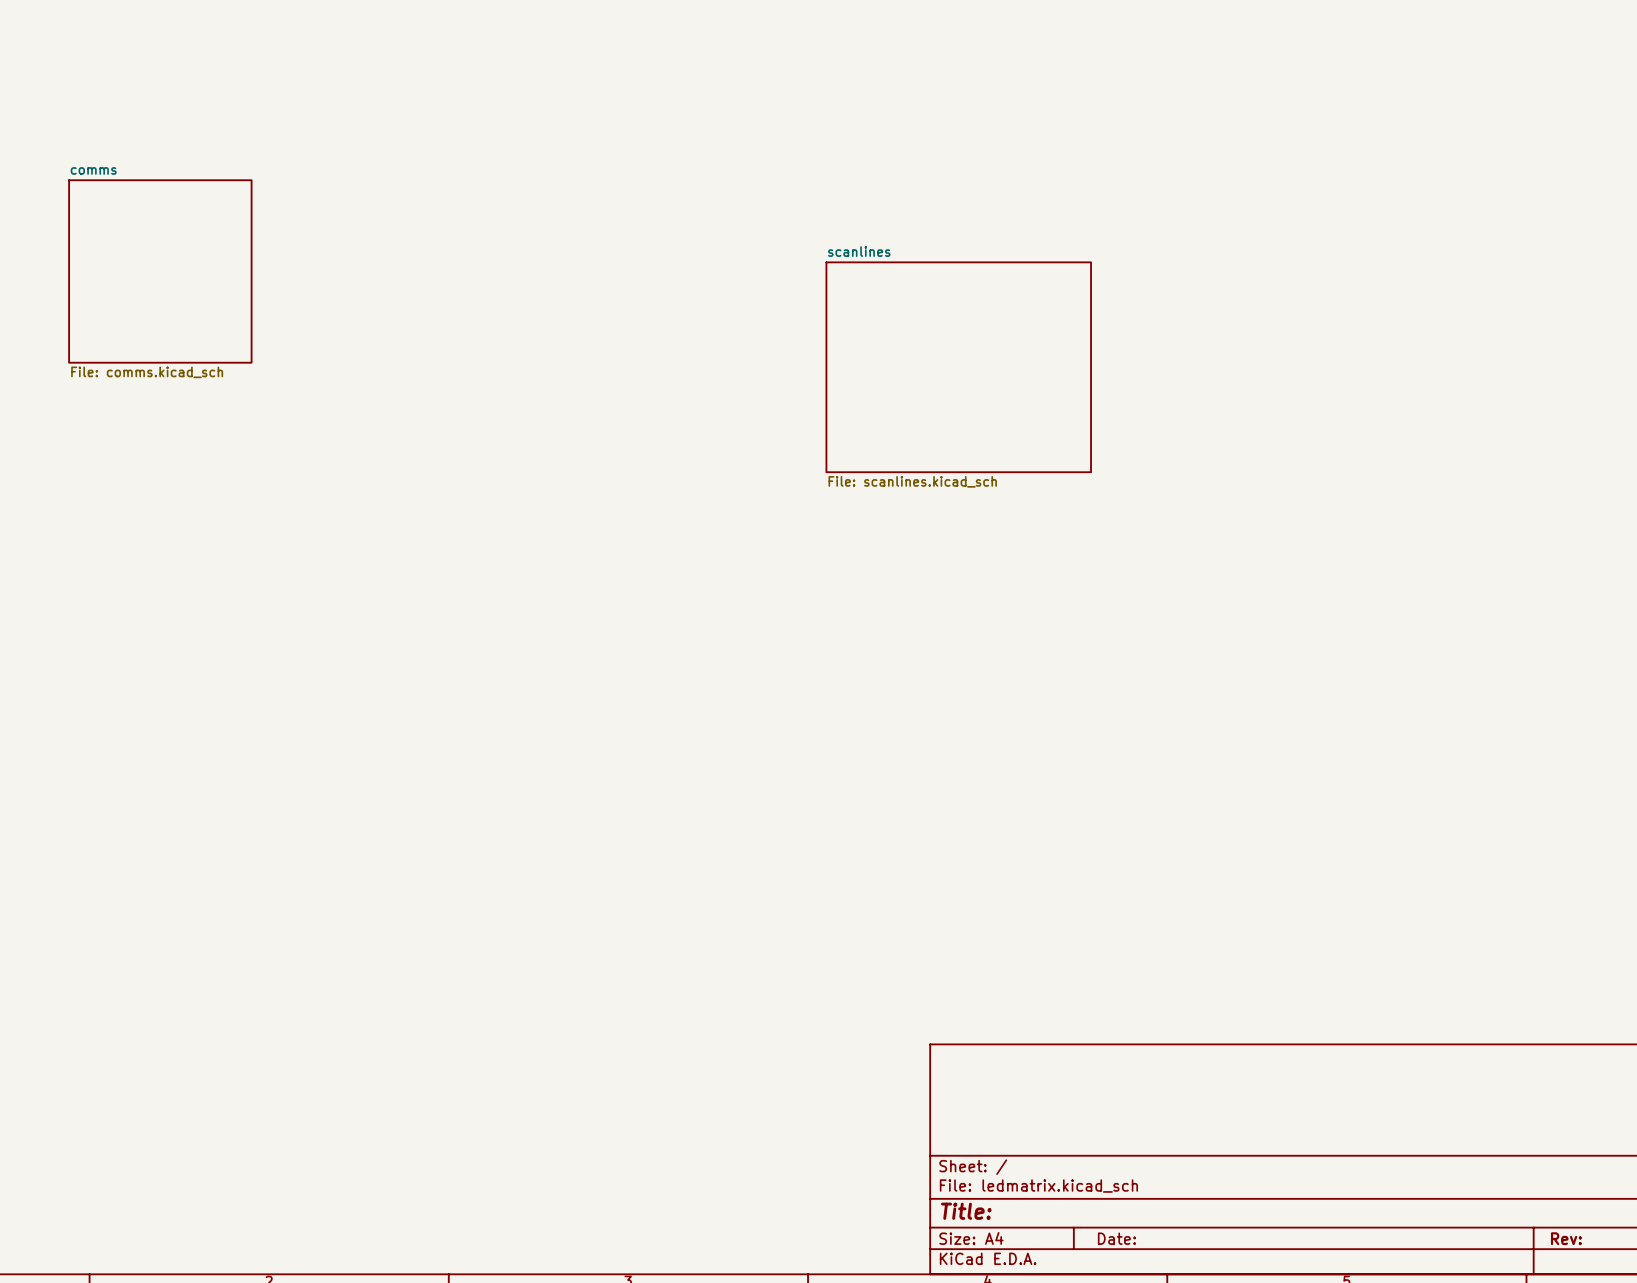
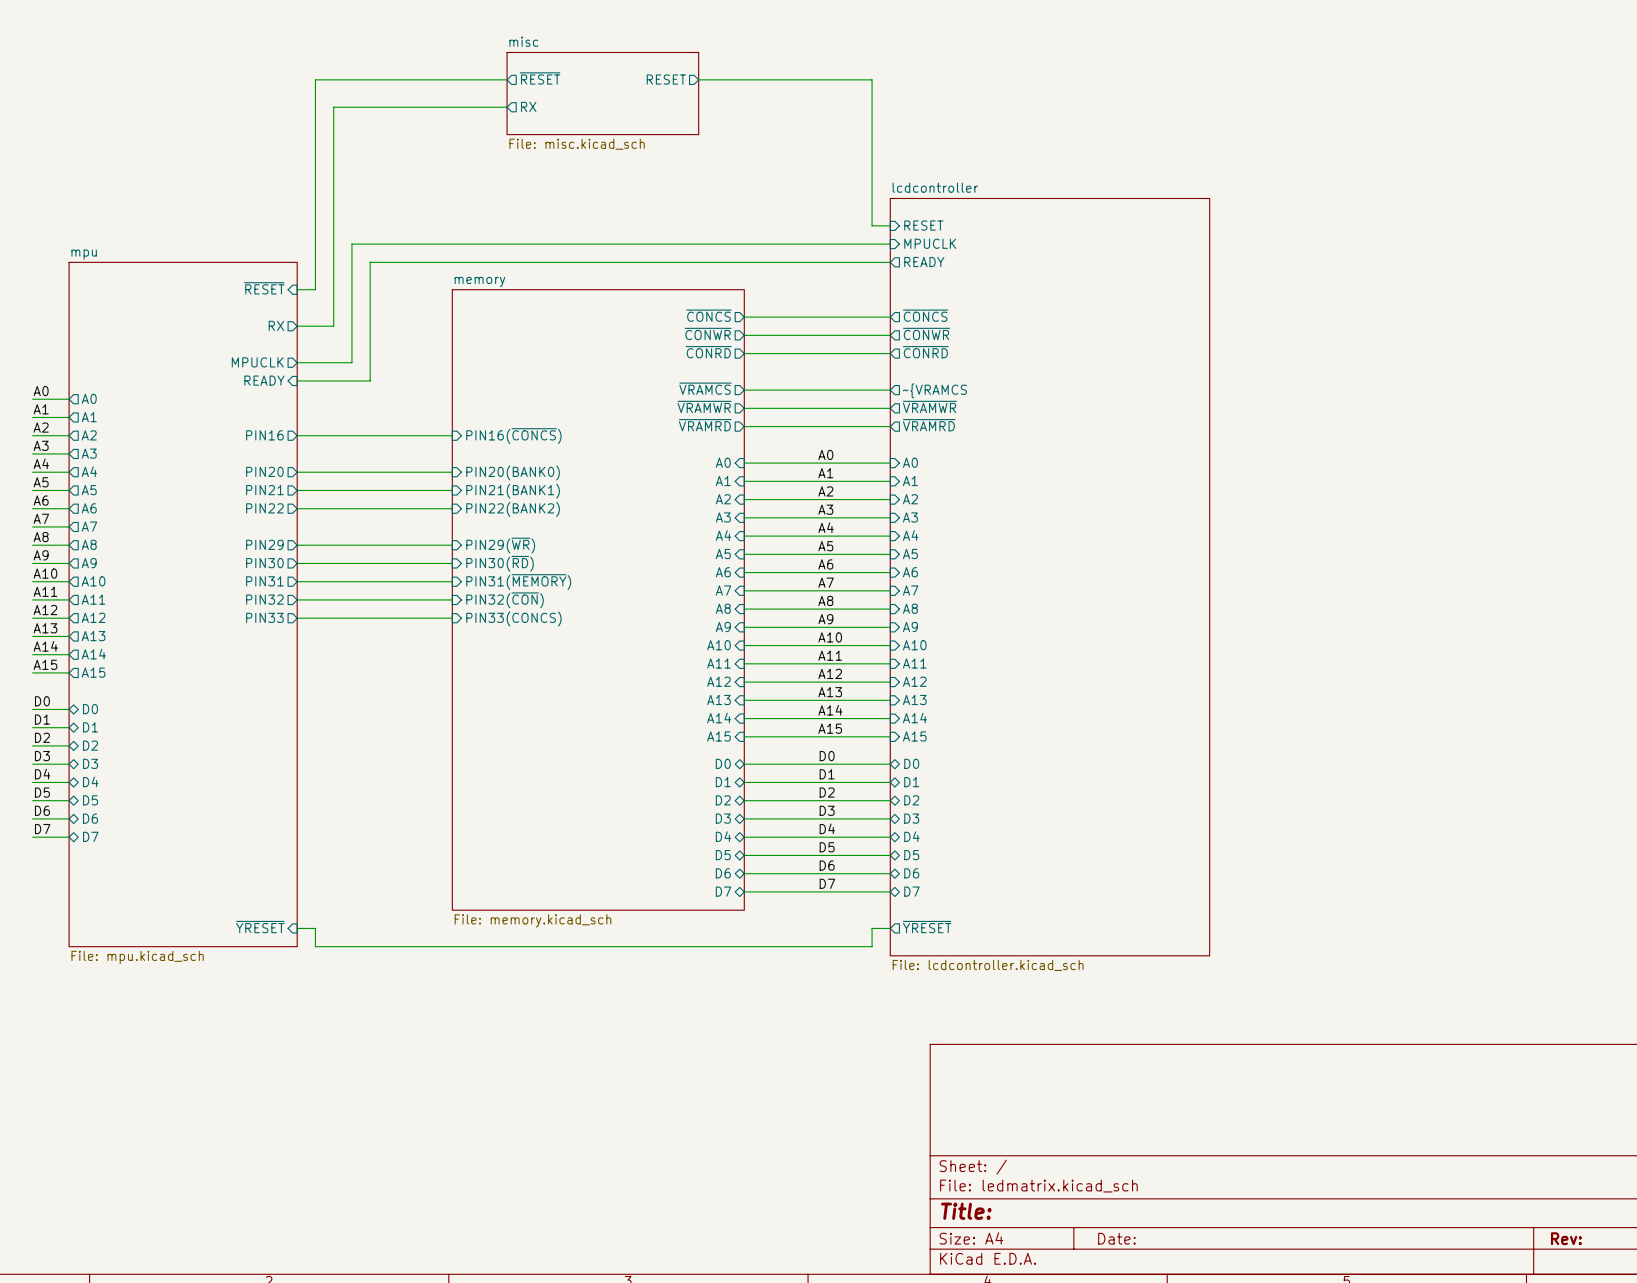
sheet pin: none -> ~{RESET} (540, 78)
wire: none -> (507, 79) (315, 79) (315, 289) (297, 289)
sheet pin: none -> RESET (666, 79)
wire: none -> (698, 79) (872, 79) (872, 225) (890, 225)
sheet misc: none -> File: misc.kicad_sch (602, 93)
sheet pin: none -> RX (528, 106)
wire: none -> (507, 107) (333, 107) (333, 326) (297, 326)
sheet pin: none -> RESET (923, 225)
sheet pin: none -> MPUCLK (930, 243)
wire: none -> (890, 244) (351, 244) (351, 362) (297, 362)
wire: none -> (890, 262) (370, 262) (370, 380) (297, 380)
sheet pin: none -> READY (924, 262)
sheet comms: File: comms.kicad_sch (160, 271) -> none
sheet pin: none -> ~{RESET} (264, 288)
sheet pin: none -> ~{CONCS} (708, 315)
sheet pin: none -> ~{CONCS} (925, 315)
wire: none -> (744, 317) (890, 317)
sheet pin: none -> RX (276, 325)
sheet pin: none -> ~{CONWR} (708, 333)
sheet pin: none -> ~{CONWR} (926, 333)
wire: none -> (744, 335) (890, 335)
sheet pin: none -> ~{CONRD} (708, 352)
sheet pin: none -> ~{CONRD} (925, 352)
wire: none -> (744, 353) (890, 353)
sheet pin: none -> MPUCLK (257, 362)
sheet scanlines: File: scanlines.kicad_sch (958, 367) -> none
sheet pin: none -> READY (264, 380)
sheet pin: none -> ~{VRAMCS} (705, 388)
wire: none -> (744, 390) (890, 390)
sheet pin: none -> ~{VRAMCS (934, 390)
label: none -> A0 (41, 391)
sheet pin: none -> A0 (89, 398)
wire: none -> (32, 399) (69, 399)
sheet pin: none -> ~{VRAMWR} (704, 406)
sheet pin: none -> ~{VRAMWR} (929, 406)
wire: none -> (744, 408) (890, 408)
label: none -> A1 (41, 409)
wire: none -> (32, 417) (69, 417)
sheet pin: none -> A1 (89, 417)
sheet pin: none -> ~{VRAMRD} (705, 425)
sheet pin: none -> ~{VRAMRD} (929, 425)
wire: none -> (744, 426) (890, 426)
label: none -> A2 (41, 427)
wire: none -> (32, 435) (69, 435)
sheet pin: none -> A2 (89, 435)
sheet pin: none -> PIN16 (264, 435)
wire: none -> (297, 435) (452, 435)
sheet pin: none -> PIN16(~{CONCS}) (513, 436)
label: none -> A3 (41, 445)
wire: none -> (32, 453) (69, 453)
sheet pin: none -> A3 (89, 453)
label: none -> A0 (825, 454)
sheet pin: none -> A0 (723, 462)
sheet pin: none -> A0 (910, 462)
label: none -> A4 (41, 463)
wire: none -> (744, 463) (890, 463)
sheet pin: none -> A4 (89, 471)
sheet pin: none -> PIN20 (264, 471)
wire: none -> (32, 472) (69, 472)
wire: none -> (297, 472) (452, 472)
sheet pin: none -> PIN20(BANK0) (513, 472)
label: none -> A1 (825, 473)
sheet pin: none -> A1 (723, 480)
sheet pin: none -> A1 (910, 480)
wire: none -> (744, 481) (890, 481)
label: none -> A5 (41, 482)
wire: none -> (32, 490) (69, 490)
sheet pin: none -> A5 (89, 490)
sheet pin: none -> PIN21 (264, 490)
wire: none -> (297, 490) (452, 490)
sheet pin: none -> PIN21(BANK1) (513, 491)
label: none -> A2 (825, 491)
sheet pin: none -> A2 (723, 499)
wire: none -> (744, 499) (890, 499)
sheet pin: none -> A2 (910, 499)
label: none -> A6 (41, 500)
wire: none -> (32, 508) (69, 508)
sheet pin: none -> A6 (89, 508)
sheet pin: none -> PIN22 (264, 508)
wire: none -> (297, 508) (452, 508)
sheet pin: none -> PIN22(BANK2) (513, 509)
label: none -> A3 (825, 509)
sheet pin: none -> A3 (723, 517)
wire: none -> (744, 517) (890, 517)
sheet pin: none -> A3 (910, 517)
label: none -> A7 (41, 518)
wire: none -> (32, 526) (69, 526)
sheet pin: none -> A7 (89, 526)
label: none -> A4 (826, 527)
sheet pin: none -> A4 (723, 535)
sheet pin: none -> A4 (910, 535)
wire: none -> (744, 536) (890, 536)
label: none -> A8 (41, 537)
sheet pin: none -> A8 (89, 544)
sheet pin: none -> PIN29 (264, 544)
wire: none -> (32, 545) (69, 545)
wire: none -> (297, 545) (452, 545)
sheet pin: none -> PIN29(~{WR}) (500, 545)
label: none -> A5 (825, 546)
sheet pin: none -> A5 (723, 553)
sheet pin: none -> A5 (910, 553)
wire: none -> (744, 554) (890, 554)
label: none -> A9 (41, 555)
wire: none -> (32, 563) (69, 563)
sheet pin: none -> A9 (89, 563)
sheet pin: none -> PIN30 (264, 563)
wire: none -> (297, 563) (452, 563)
sheet pin: none -> PIN30(~{RD}) (500, 563)
label: none -> A6 (825, 564)
sheet pin: none -> A6 (723, 572)
wire: none -> (744, 572) (890, 572)
sheet pin: none -> A6 (910, 572)
label: none -> A10 (45, 573)
sheet lcdcontroller: none -> File: lcdcontroller.kicad_sch (1049, 577)
wire: none -> (32, 581) (69, 581)
sheet pin: none -> A10 (93, 581)
sheet pin: none -> PIN31 (264, 581)
wire: none -> (297, 581) (452, 581)
sheet pin: none -> PIN31(~{MEMORY}) (518, 582)
label: none -> A7 (826, 582)
sheet pin: none -> A7 (723, 590)
wire: none -> (744, 590) (890, 590)
sheet pin: none -> A7 (910, 590)
label: none -> A11 (45, 591)
wire: none -> (32, 599) (69, 599)
sheet pin: none -> A11 (93, 599)
sheet pin: none -> PIN32 (264, 599)
wire: none -> (297, 599) (452, 599)
sheet memory: none -> File: memory.kicad_sch (598, 599)
sheet pin: none -> PIN32(~{CON}) (505, 600)
label: none -> A8 (825, 600)
sheet mpu: none -> File: mpu.kicad_sch (183, 604)
sheet pin: none -> A8 (723, 608)
sheet pin: none -> A8 (910, 608)
wire: none -> (744, 609) (890, 609)
label: none -> A12 (45, 610)
sheet pin: none -> A12 (93, 617)
sheet pin: none -> PIN33 (264, 617)
wire: none -> (32, 618) (69, 618)
wire: none -> (297, 618) (452, 618)
sheet pin: none -> PIN33(CONCS) (513, 618)
label: none -> A9 (825, 619)
sheet pin: none -> A9 (723, 626)
sheet pin: none -> A9 (910, 626)
wire: none -> (744, 627) (890, 627)
label: none -> A13 (45, 628)
wire: none -> (32, 636) (69, 636)
sheet pin: none -> A13 (93, 636)
label: none -> A10 (830, 637)
sheet pin: none -> A10 (718, 645)
wire: none -> (744, 645) (890, 645)
sheet pin: none -> A10 (914, 645)
label: none -> A14 (45, 646)
wire: none -> (32, 654) (69, 654)
sheet pin: none -> A14 (93, 654)
label: none -> A11 (830, 655)
sheet pin: none -> A11 (718, 663)
wire: none -> (744, 663) (890, 663)
sheet pin: none -> A11 (914, 663)
label: none -> A15 (45, 664)
wire: none -> (32, 672) (69, 672)
sheet pin: none -> A15 (93, 672)
label: none -> A12 (830, 673)
sheet pin: none -> A12 (718, 681)
sheet pin: none -> A12 (914, 681)
wire: none -> (744, 682) (890, 682)
label: none -> A13 (830, 692)
sheet pin: none -> A13 (718, 699)
sheet pin: none -> A13 (914, 699)
wire: none -> (744, 700) (890, 700)
label: none -> D0 (42, 701)
wire: none -> (32, 709) (69, 709)
sheet pin: none -> D0 (90, 709)
label: none -> A14 (830, 710)
sheet pin: none -> A14 (719, 718)
wire: none -> (744, 718) (890, 718)
sheet pin: none -> A14 (914, 718)
label: none -> D1 (42, 719)
wire: none -> (32, 727) (69, 727)
sheet pin: none -> D1 (90, 727)
label: none -> A15 (830, 728)
sheet pin: none -> A15 (718, 736)
wire: none -> (744, 736) (890, 736)
sheet pin: none -> A15 (914, 736)
label: none -> D2 (42, 737)
wire: none -> (32, 745) (69, 745)
sheet pin: none -> D2 (90, 745)
label: none -> D3 (42, 756)
label: none -> D0 (827, 756)
sheet pin: none -> D3 (90, 763)
sheet pin: none -> D0 (723, 763)
sheet pin: none -> D0 (911, 763)
wire: none -> (32, 764) (69, 764)
wire: none -> (744, 764) (890, 764)
label: none -> D4 (42, 774)
label: none -> D1 (827, 774)
sheet pin: none -> D4 (90, 781)
wire: none -> (32, 782) (69, 782)
sheet pin: none -> D1 (723, 782)
wire: none -> (744, 782) (890, 782)
sheet pin: none -> D1 (911, 782)
label: none -> D5 (42, 792)
label: none -> D2 (827, 792)
wire: none -> (32, 800) (69, 800)
sheet pin: none -> D5 (90, 800)
sheet pin: none -> D2 (723, 800)
wire: none -> (744, 800) (890, 800)
sheet pin: none -> D2 (911, 800)
label: none -> D6 (42, 810)
label: none -> D3 (827, 810)
wire: none -> (32, 818) (69, 818)
sheet pin: none -> D6 (90, 818)
sheet pin: none -> D3 (723, 818)
wire: none -> (744, 818) (890, 818)
sheet pin: none -> D3 (911, 818)
label: none -> D4 (827, 828)
label: none -> D7 (42, 829)
sheet pin: none -> D7 (90, 836)
sheet pin: none -> D4 (723, 836)
sheet pin: none -> D4 (911, 836)
wire: none -> (32, 837) (69, 837)
wire: none -> (744, 837) (890, 837)
label: none -> D5 (827, 847)
sheet pin: none -> D5 (723, 855)
wire: none -> (744, 855) (890, 855)
sheet pin: none -> D5 (911, 855)
label: none -> D6 (827, 865)
sheet pin: none -> D6 (723, 873)
wire: none -> (744, 873) (890, 873)
sheet pin: none -> D6 (911, 873)
label: none -> D7 (827, 883)
sheet pin: none -> D7 (723, 891)
wire: none -> (744, 891) (890, 891)
sheet pin: none -> D7 (911, 891)
sheet pin: none -> ~{YRESET} (260, 927)
sheet pin: none -> ~{YRESET} (927, 927)
wire: none -> (297, 928) (315, 928) (315, 946) (872, 946) (872, 928) (890, 928)

